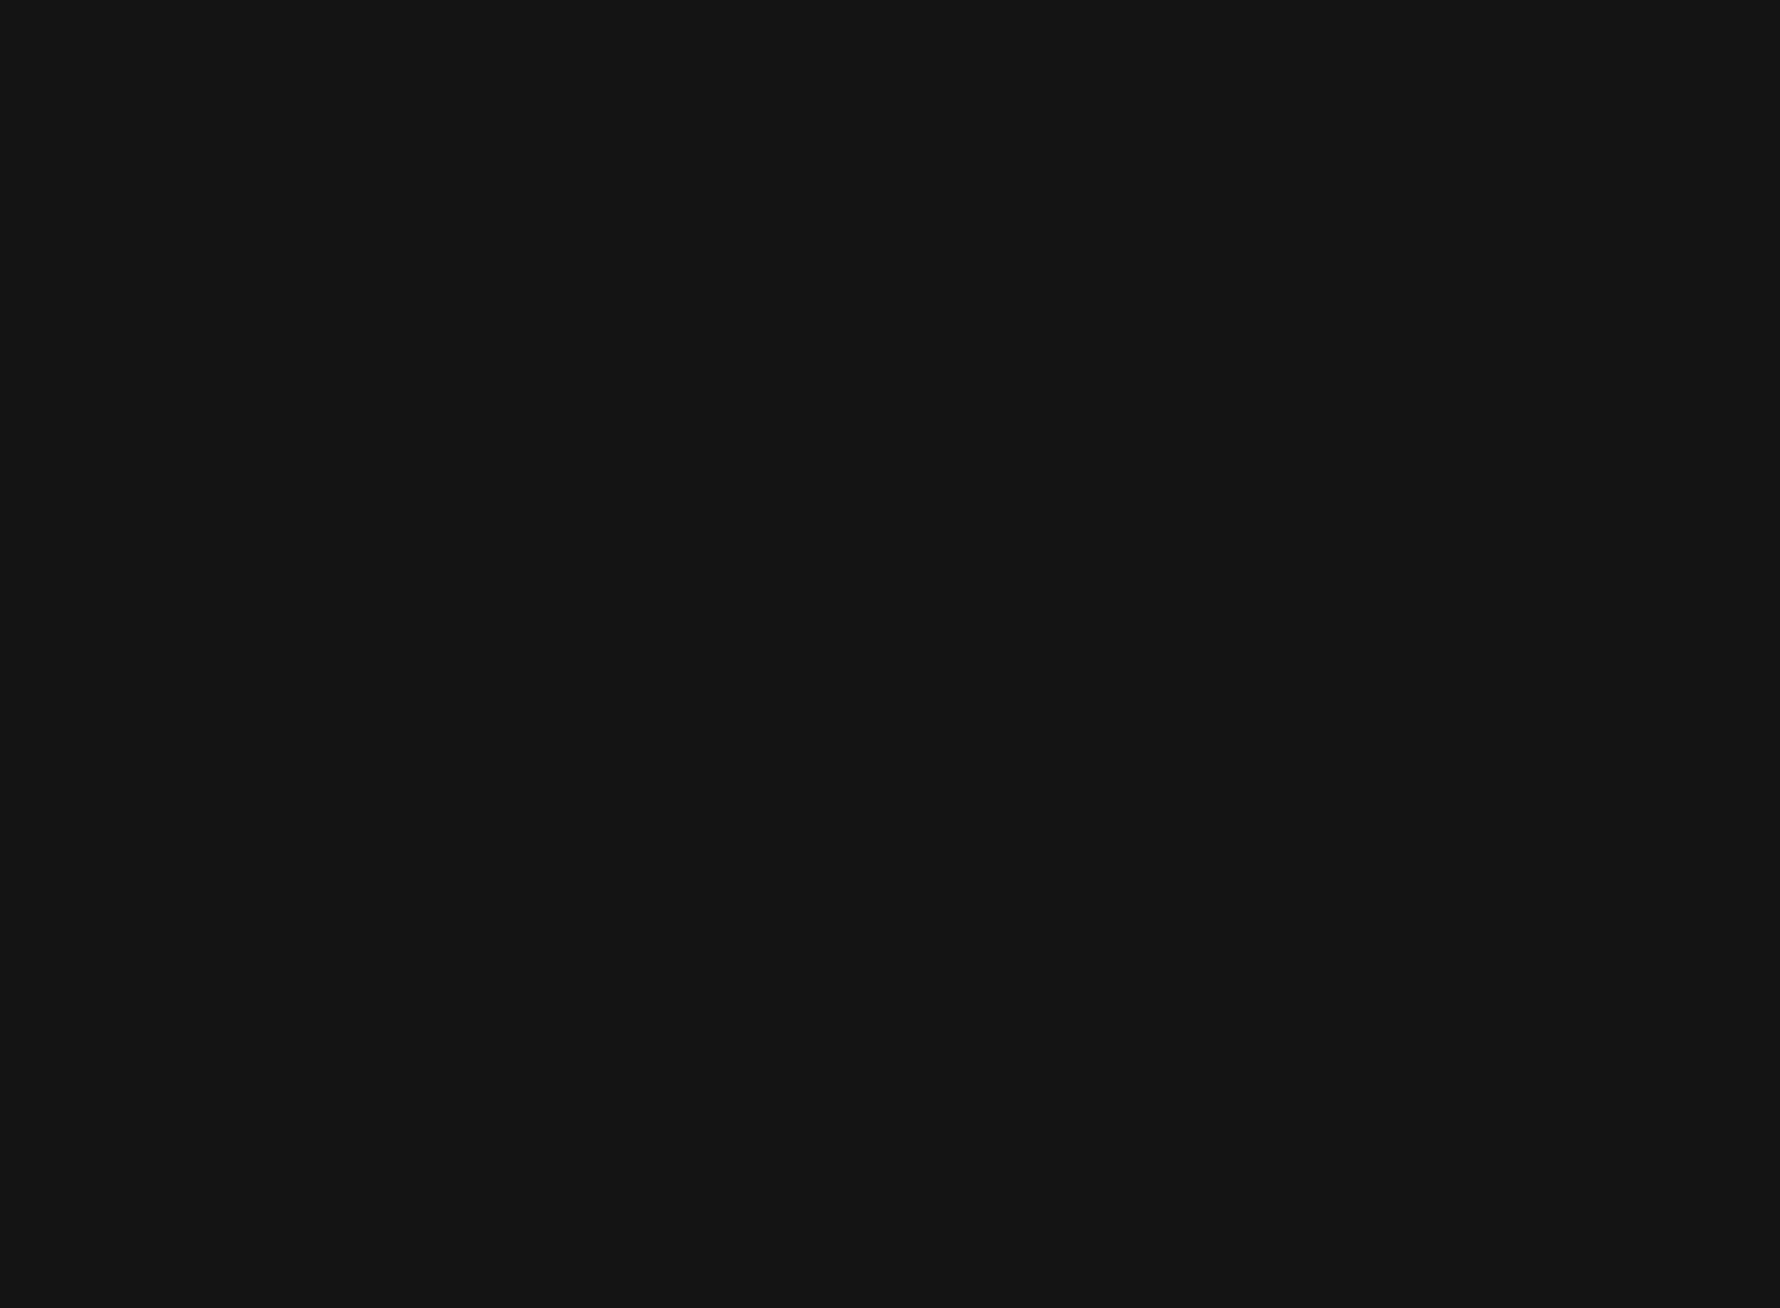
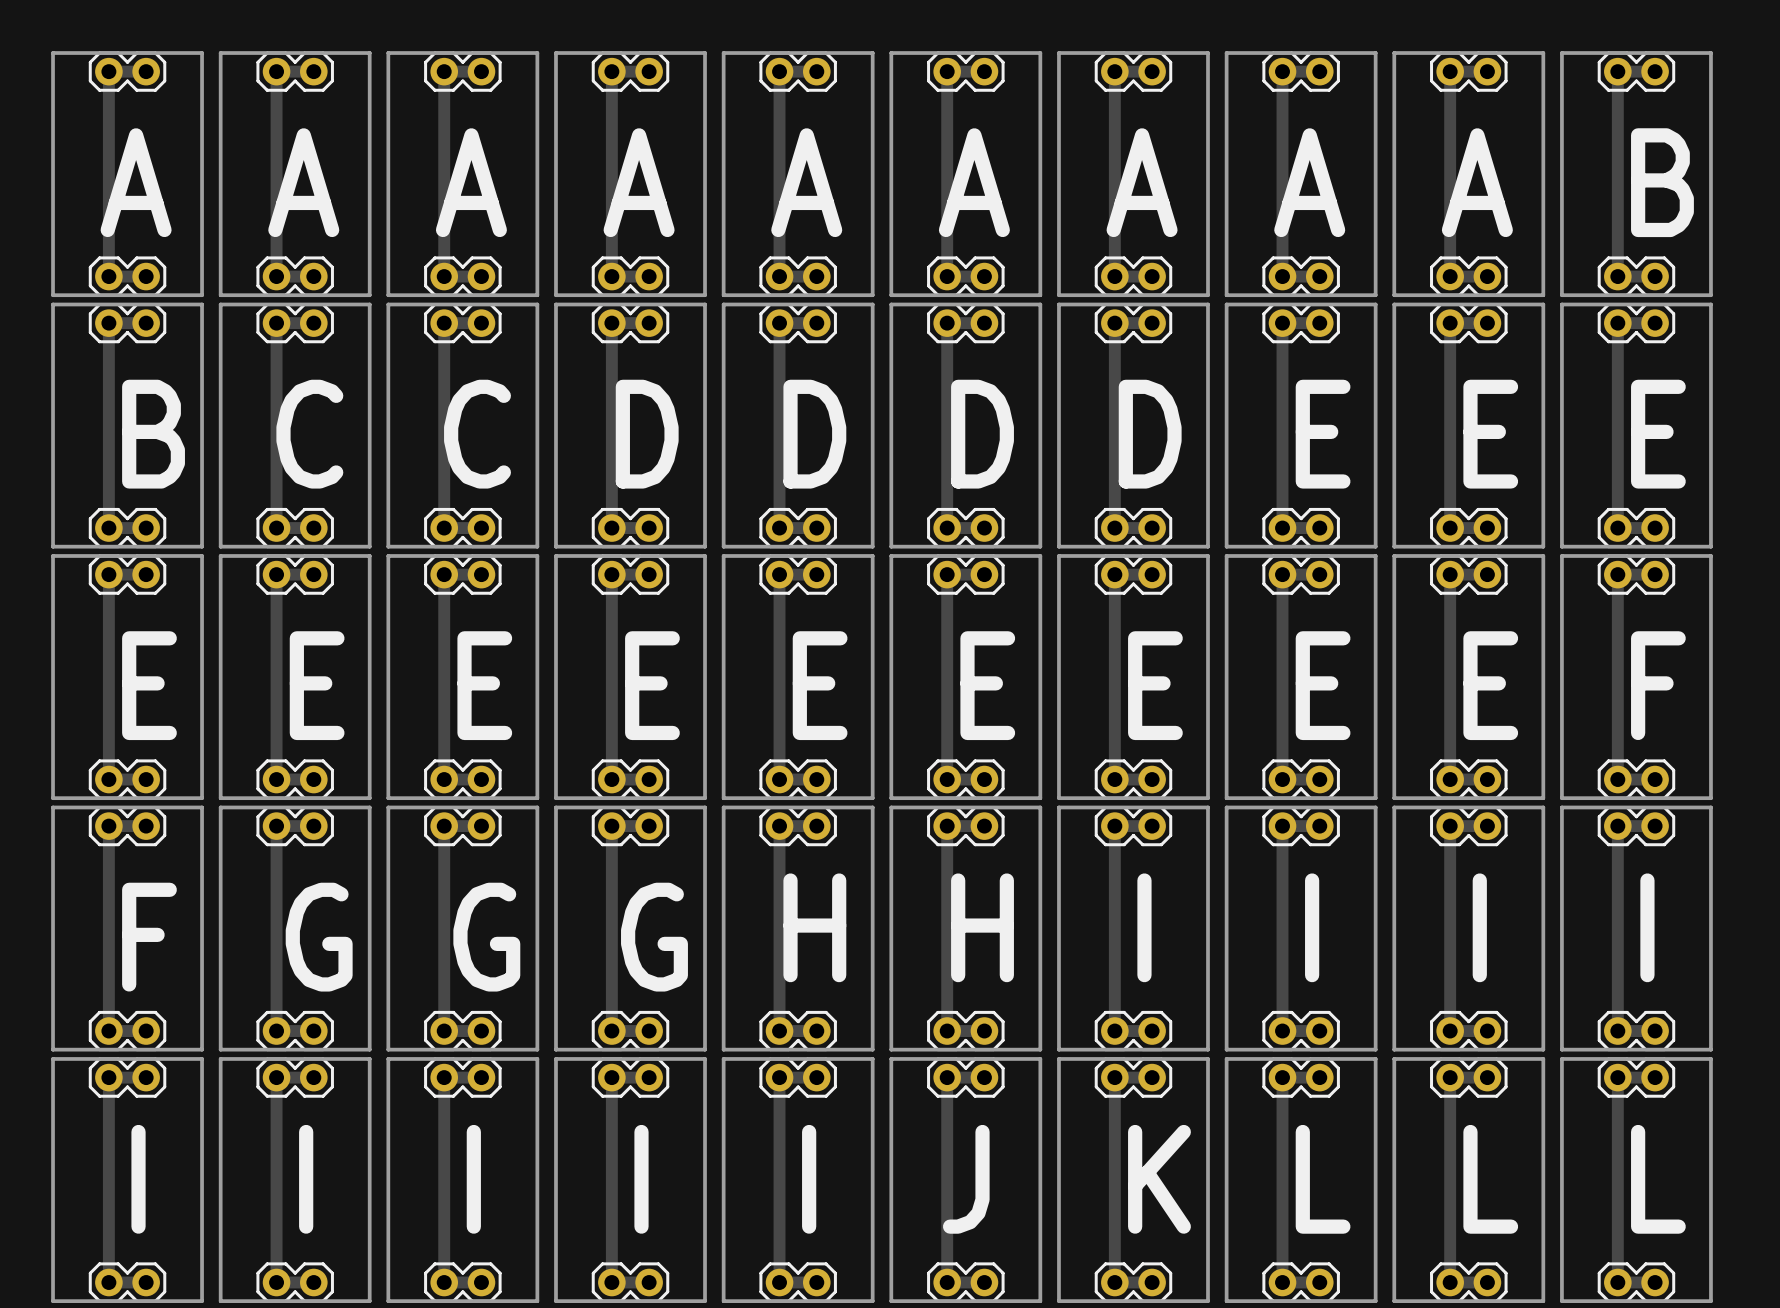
part: none -> (127, 174)
part: none -> (295, 174)
part: none -> (462, 174)
part: none -> (630, 174)
part: none -> (798, 174)
part: none -> (965, 174)
part: none -> (1133, 174)
part: none -> (1301, 174)
part: none -> (1468, 174)
part: none -> (1636, 174)
text: none -> A (136, 182)
text: none -> A (303, 182)
text: none -> A (471, 182)
text: none -> A (639, 182)
text: none -> A (806, 182)
text: none -> A (974, 182)
text: none -> A (1142, 182)
text: none -> A (1309, 182)
text: none -> A (1477, 182)
text: none -> B (1662, 182)
part: none -> (127, 425)
part: none -> (295, 425)
part: none -> (462, 425)
part: none -> (630, 425)
part: none -> (798, 425)
part: none -> (965, 425)
part: none -> (1133, 425)
part: none -> (1301, 425)
part: none -> (1468, 425)
part: none -> (1636, 425)
text: none -> B (153, 434)
text: none -> C (309, 434)
text: none -> C (477, 434)
text: none -> D (647, 434)
text: none -> D (814, 434)
text: none -> D (982, 434)
text: none -> D (1150, 434)
text: none -> E (1323, 434)
text: none -> E (1490, 434)
text: none -> E (1658, 434)
part: none -> (127, 677)
part: none -> (295, 677)
part: none -> (462, 677)
part: none -> (630, 677)
part: none -> (798, 677)
part: none -> (965, 677)
part: none -> (1133, 677)
part: none -> (1301, 677)
part: none -> (1468, 677)
part: none -> (1636, 677)
text: none -> E (149, 685)
text: none -> E (317, 685)
text: none -> E (484, 685)
text: none -> E (652, 685)
text: none -> E (820, 685)
text: none -> E (987, 685)
text: none -> E (1155, 685)
text: none -> E (1323, 685)
text: none -> E (1490, 685)
text: none -> F (1658, 685)
text: none -> H (814, 927)
text: none -> H (982, 927)
text: none -> I (1144, 927)
text: none -> I (1312, 927)
text: none -> I (1479, 927)
text: none -> I (1647, 927)
part: none -> (127, 928)
part: none -> (295, 928)
part: none -> (462, 928)
part: none -> (630, 928)
part: none -> (798, 928)
part: none -> (965, 928)
part: none -> (1133, 928)
part: none -> (1301, 928)
part: none -> (1468, 928)
part: none -> (1636, 928)
text: none -> F (149, 937)
text: none -> G (319, 937)
text: none -> G (486, 937)
text: none -> G (654, 937)
text: none -> I (138, 1179)
text: none -> I (306, 1179)
text: none -> I (473, 1179)
text: none -> I (641, 1179)
text: none -> I (809, 1179)
text: none -> J (966, 1179)
text: none -> K (1159, 1179)
text: none -> L (1323, 1179)
text: none -> L (1490, 1179)
text: none -> L (1658, 1179)
part: none -> (127, 1180)
part: none -> (295, 1180)
part: none -> (462, 1180)
part: none -> (630, 1180)
part: none -> (798, 1180)
part: none -> (965, 1180)
part: none -> (1133, 1180)
part: none -> (1301, 1180)
part: none -> (1468, 1180)
part: none -> (1636, 1180)

